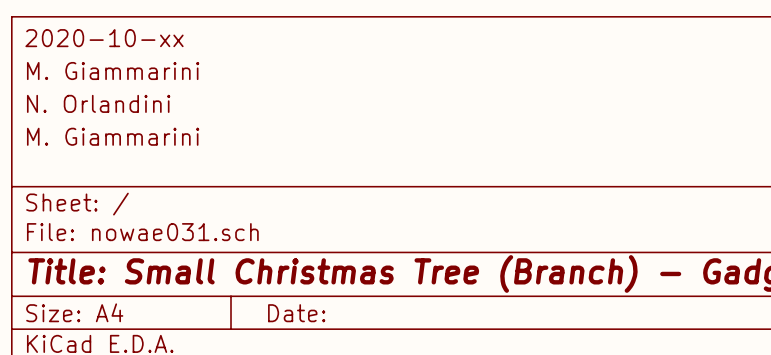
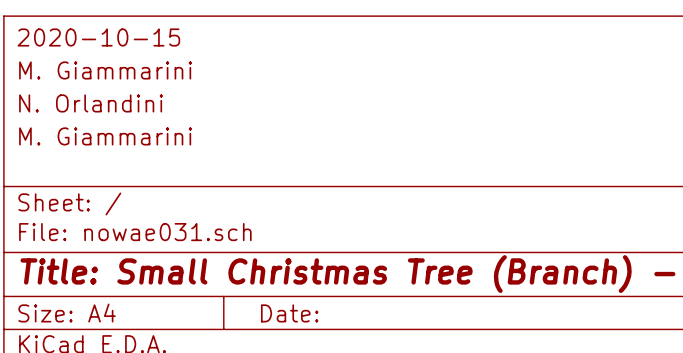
title block: 2020-10-xx (104, 38) -> 2020-10-15 (98, 37)

